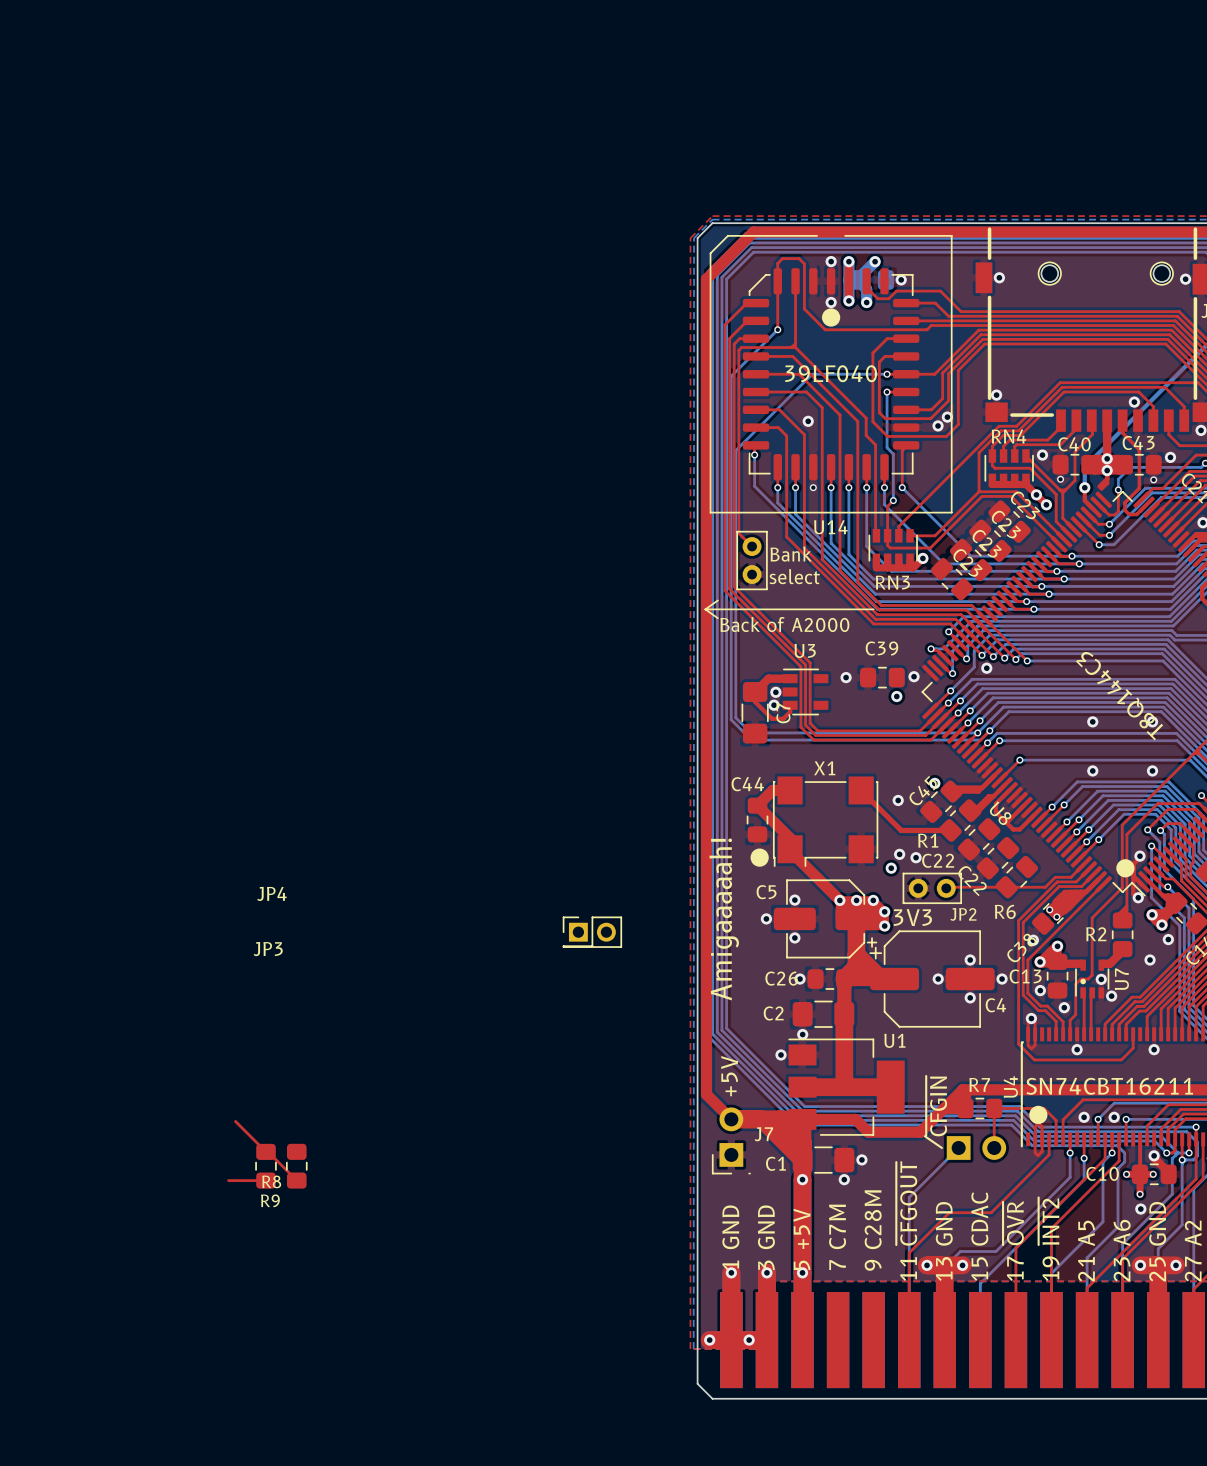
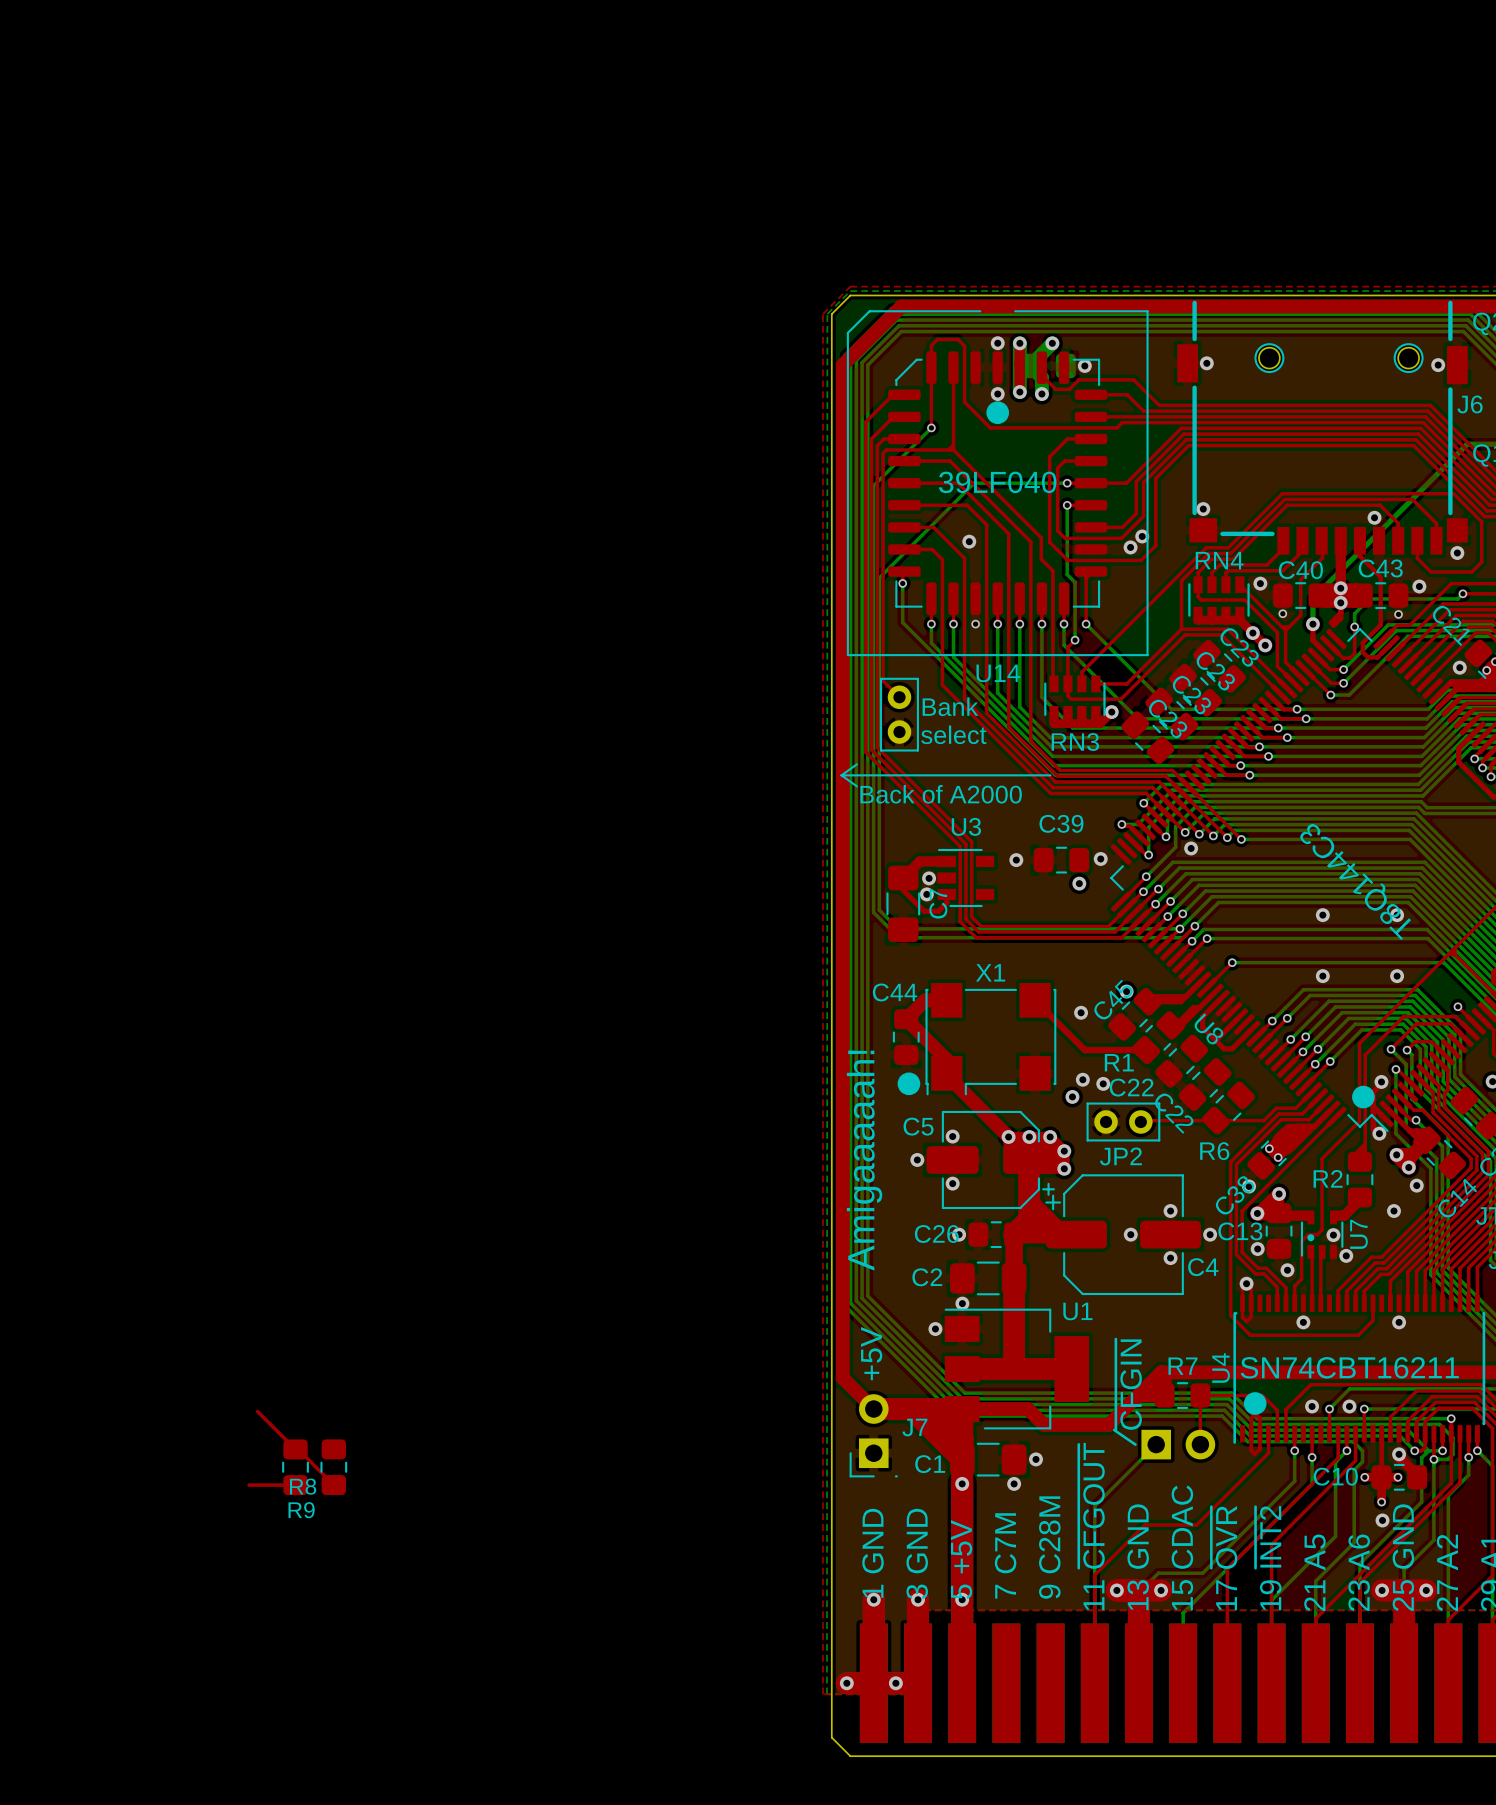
text: JP4 (271, 893) -> none
text position: JP2 (963, 914) -> JP2 (1120, 1156)
text: 3V3 (912, 917) -> none
part: (592, 932) -> none
text: JP3 (268, 949) -> none

